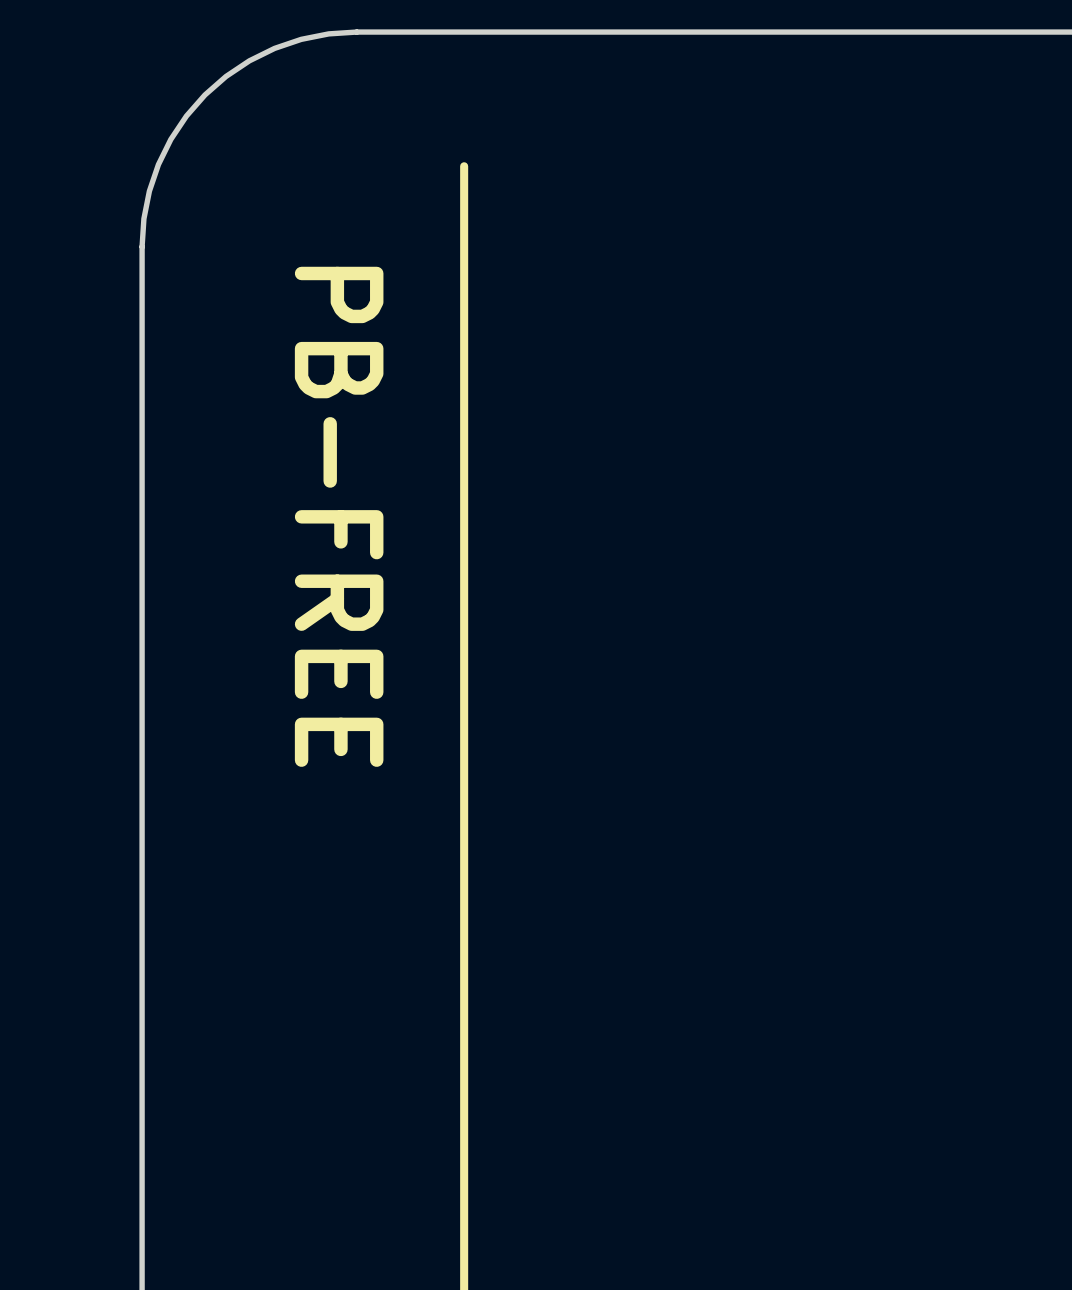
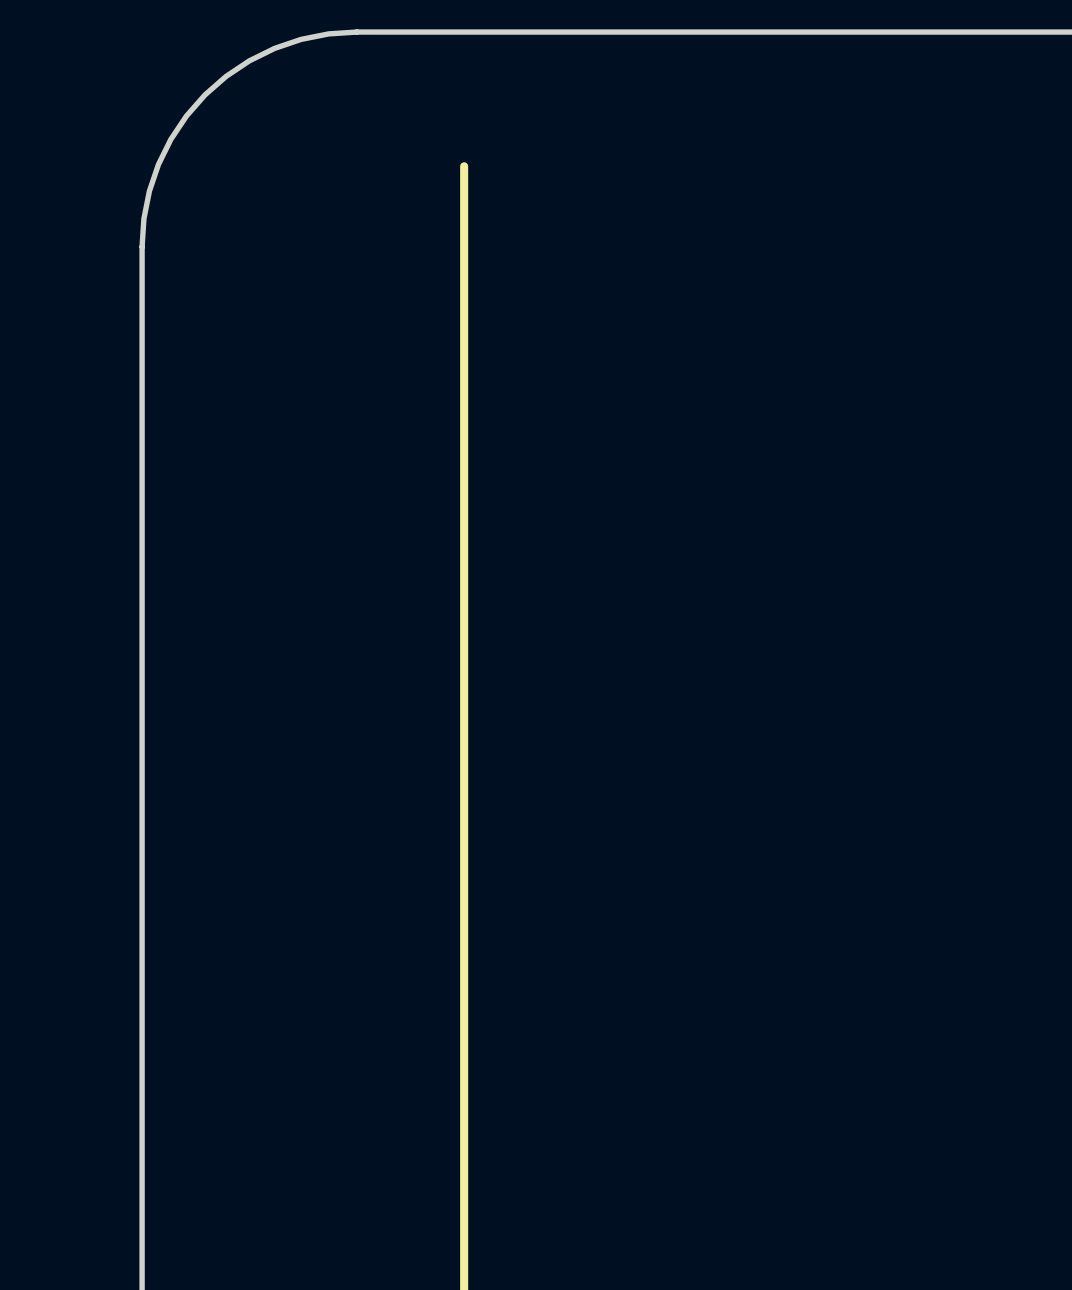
text: PB-FREE (339, 516) -> none

